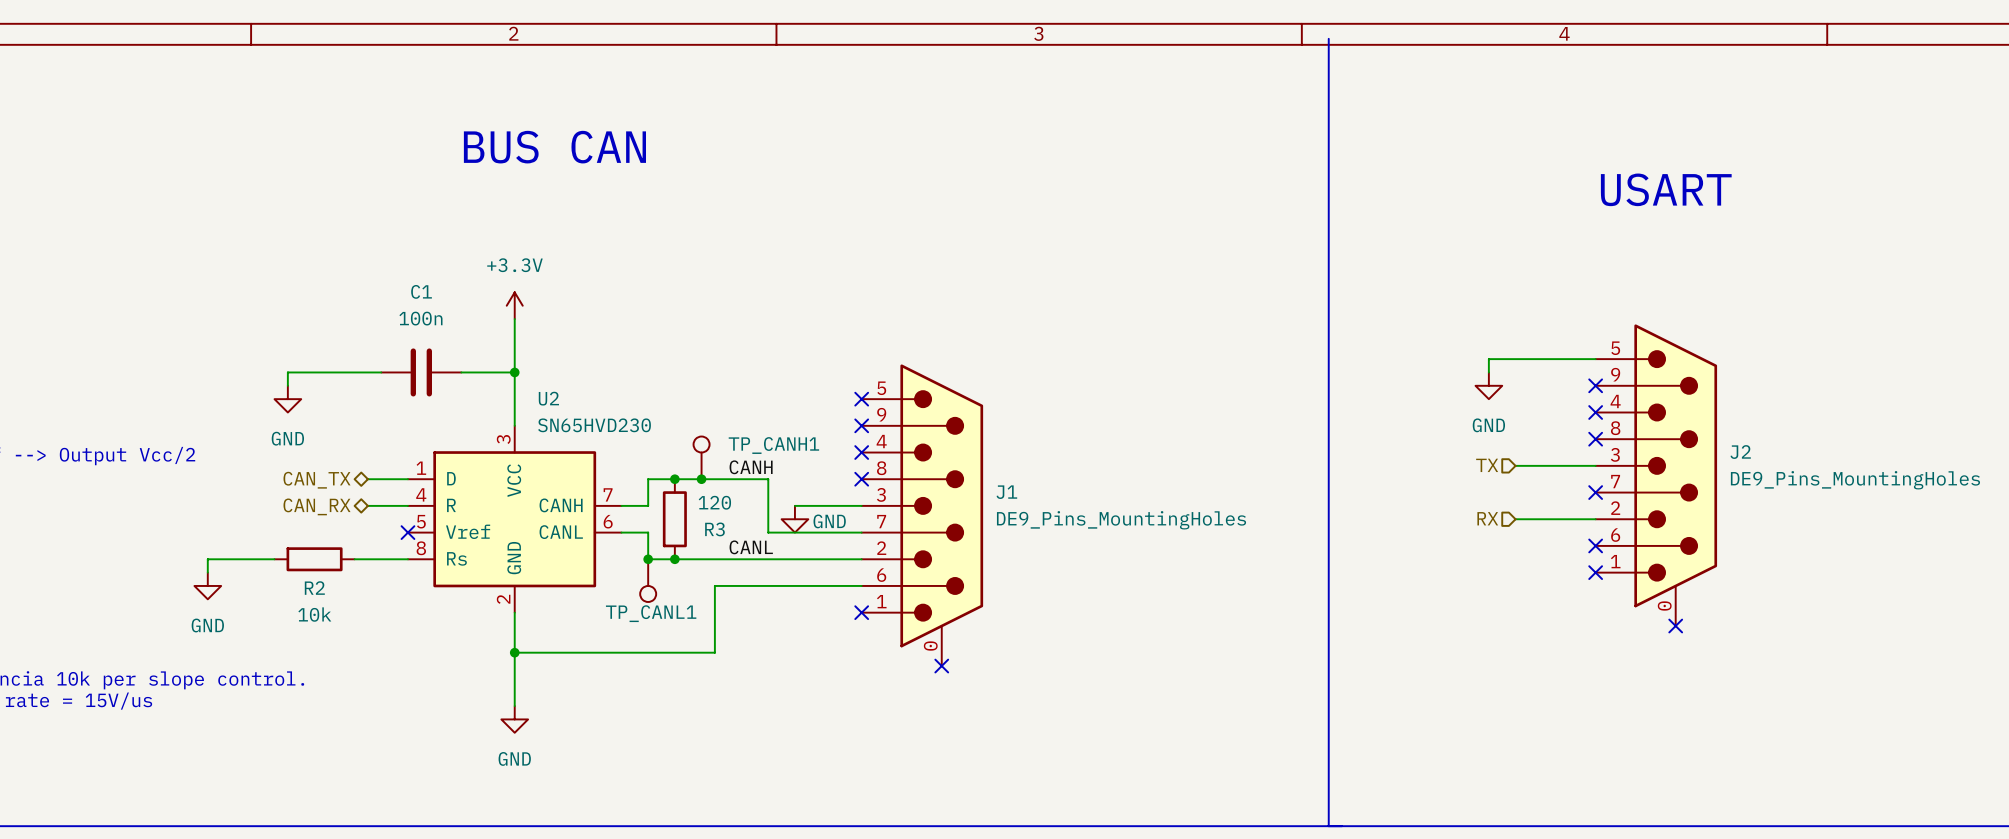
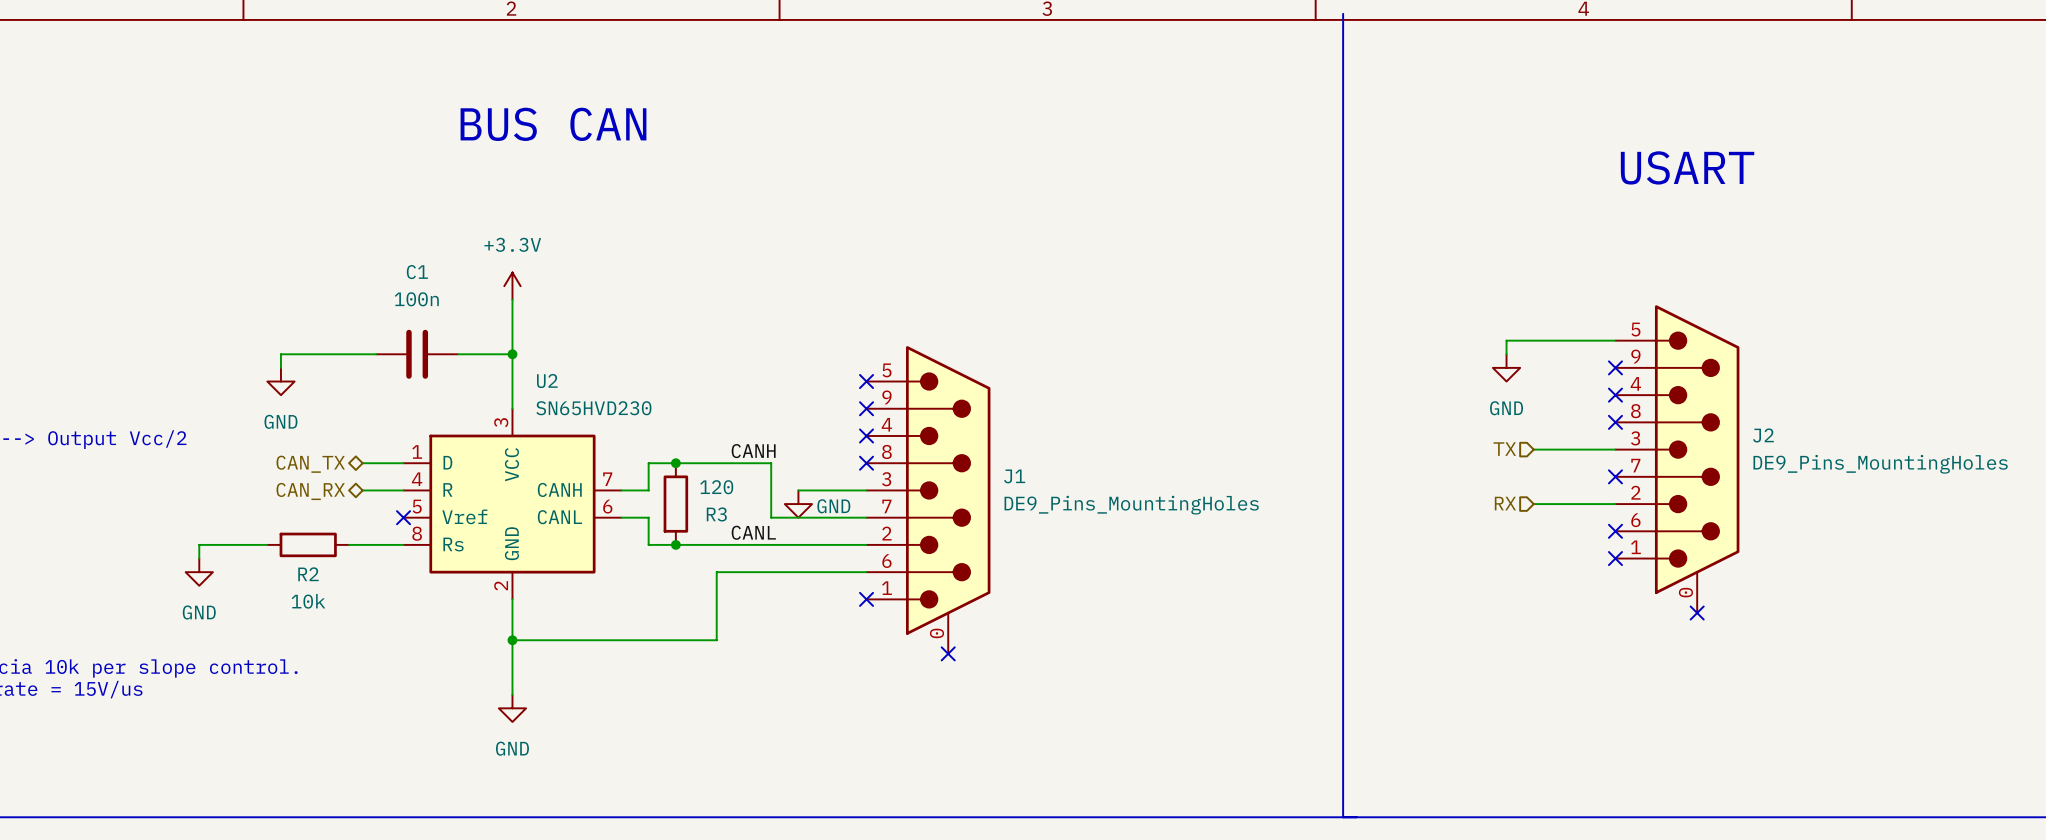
TP_CANH1: (701, 457) -> none
junction: (701, 479) -> none
junction: (648, 559) -> none
TP_CANL1: (648, 580) -> none

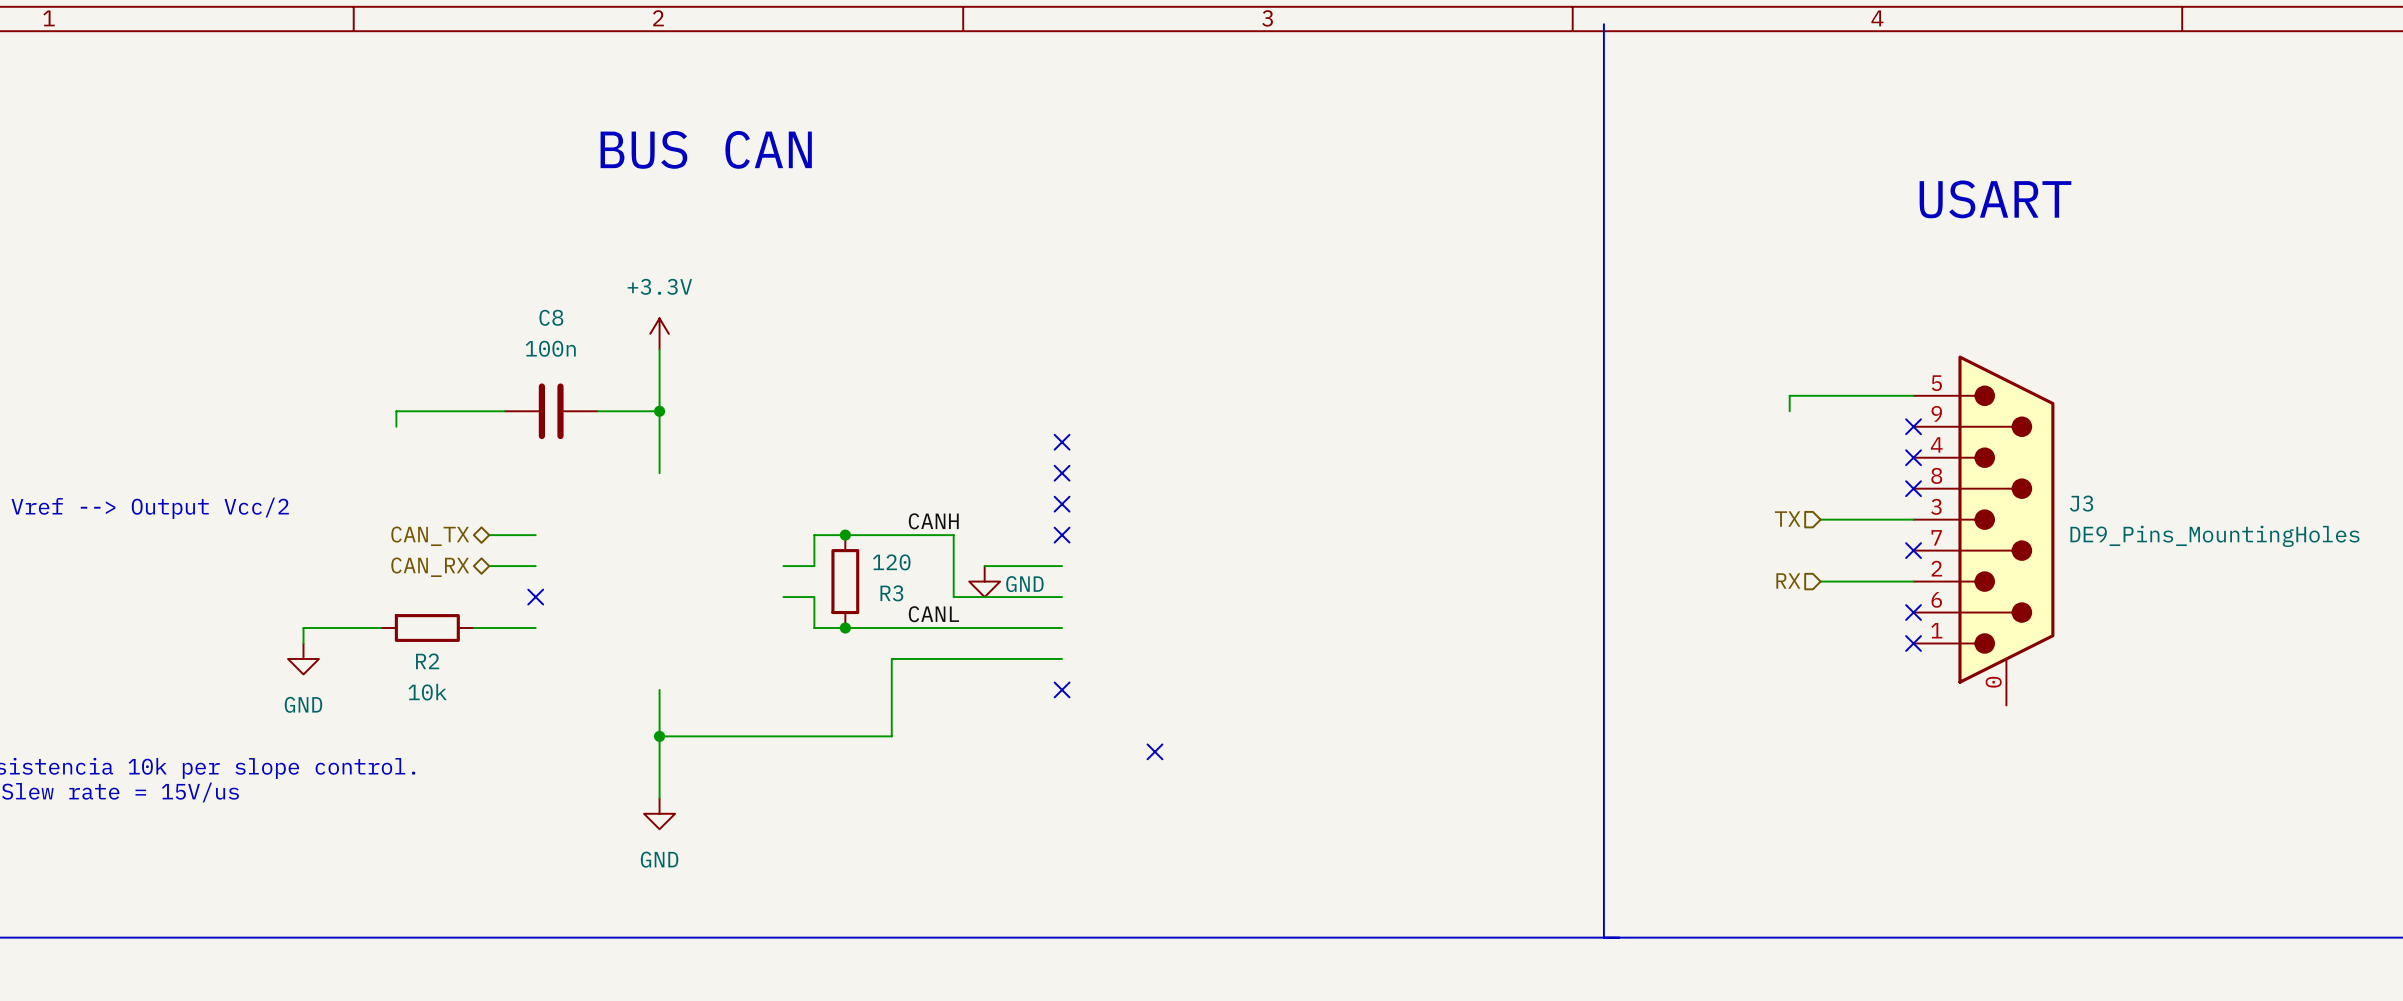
C1 name: C1 (417, 272) -> C8 (551, 317)
power symbol: GND (1506, 367) -> none
power symbol: GND (280, 381) -> none
J2 name: J2 (1763, 435) -> J3 (2081, 503)
J1: DE9_Pins_MountingHoles (928, 499) -> none
U2: SN65HVD230 (512, 504) -> none
no-connect mark: (1697, 613) -> none

